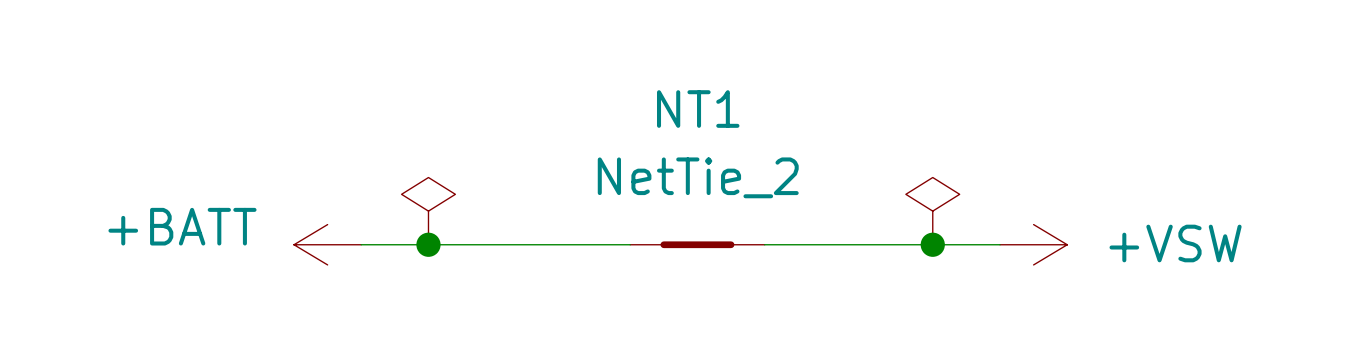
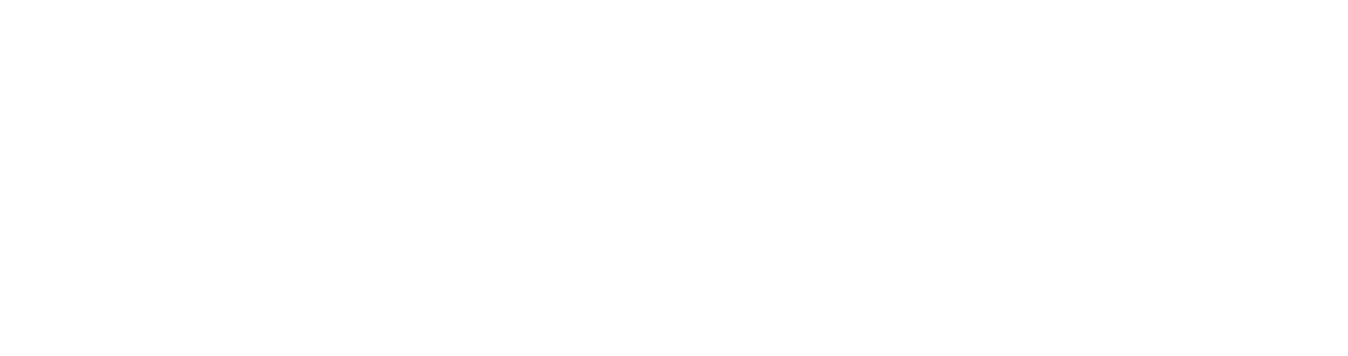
power symbol: (428, 211) -> none
power symbol: (932, 211) -> none
power symbol: +BATT (327, 244) -> none
wire: (361, 244) (630, 244) -> none
junction: (428, 244) -> none
NT1: NetTie_2 (697, 244) -> none
wire: (764, 244) (1000, 244) -> none
junction: (932, 244) -> none
power symbol: +VSW (1033, 244) -> none

